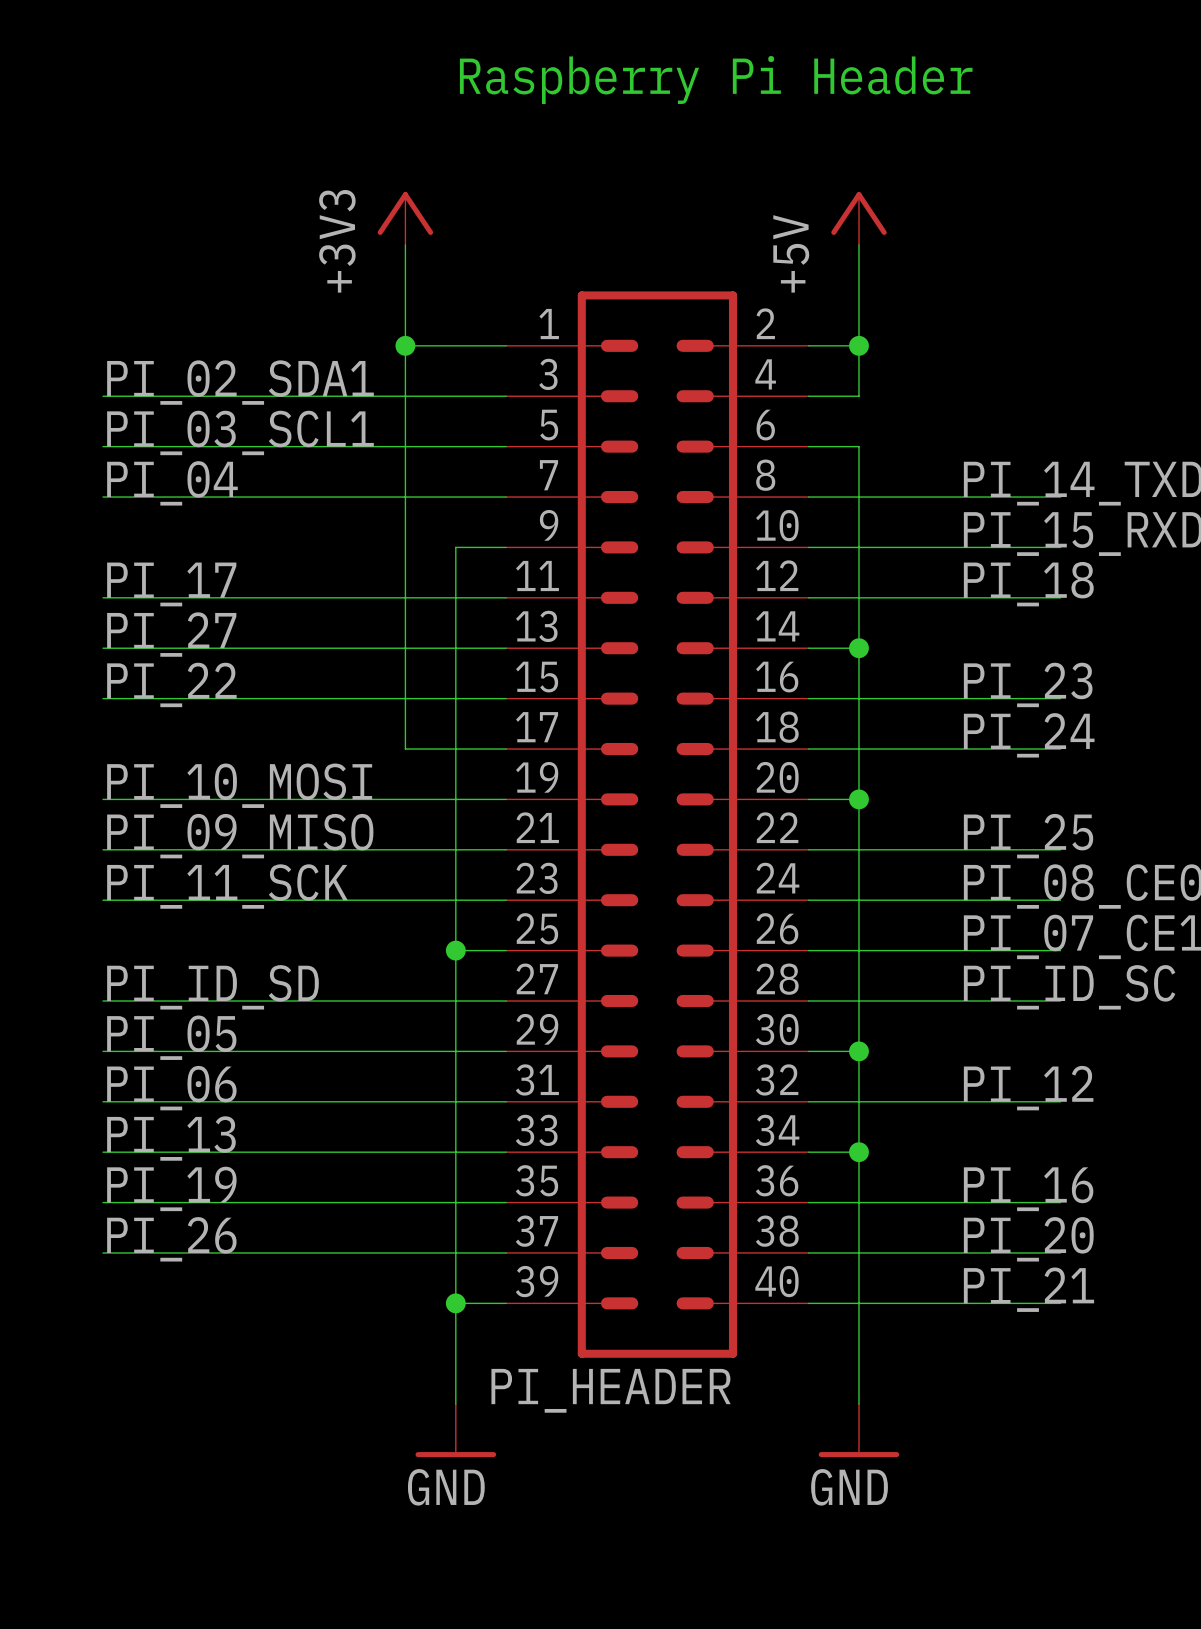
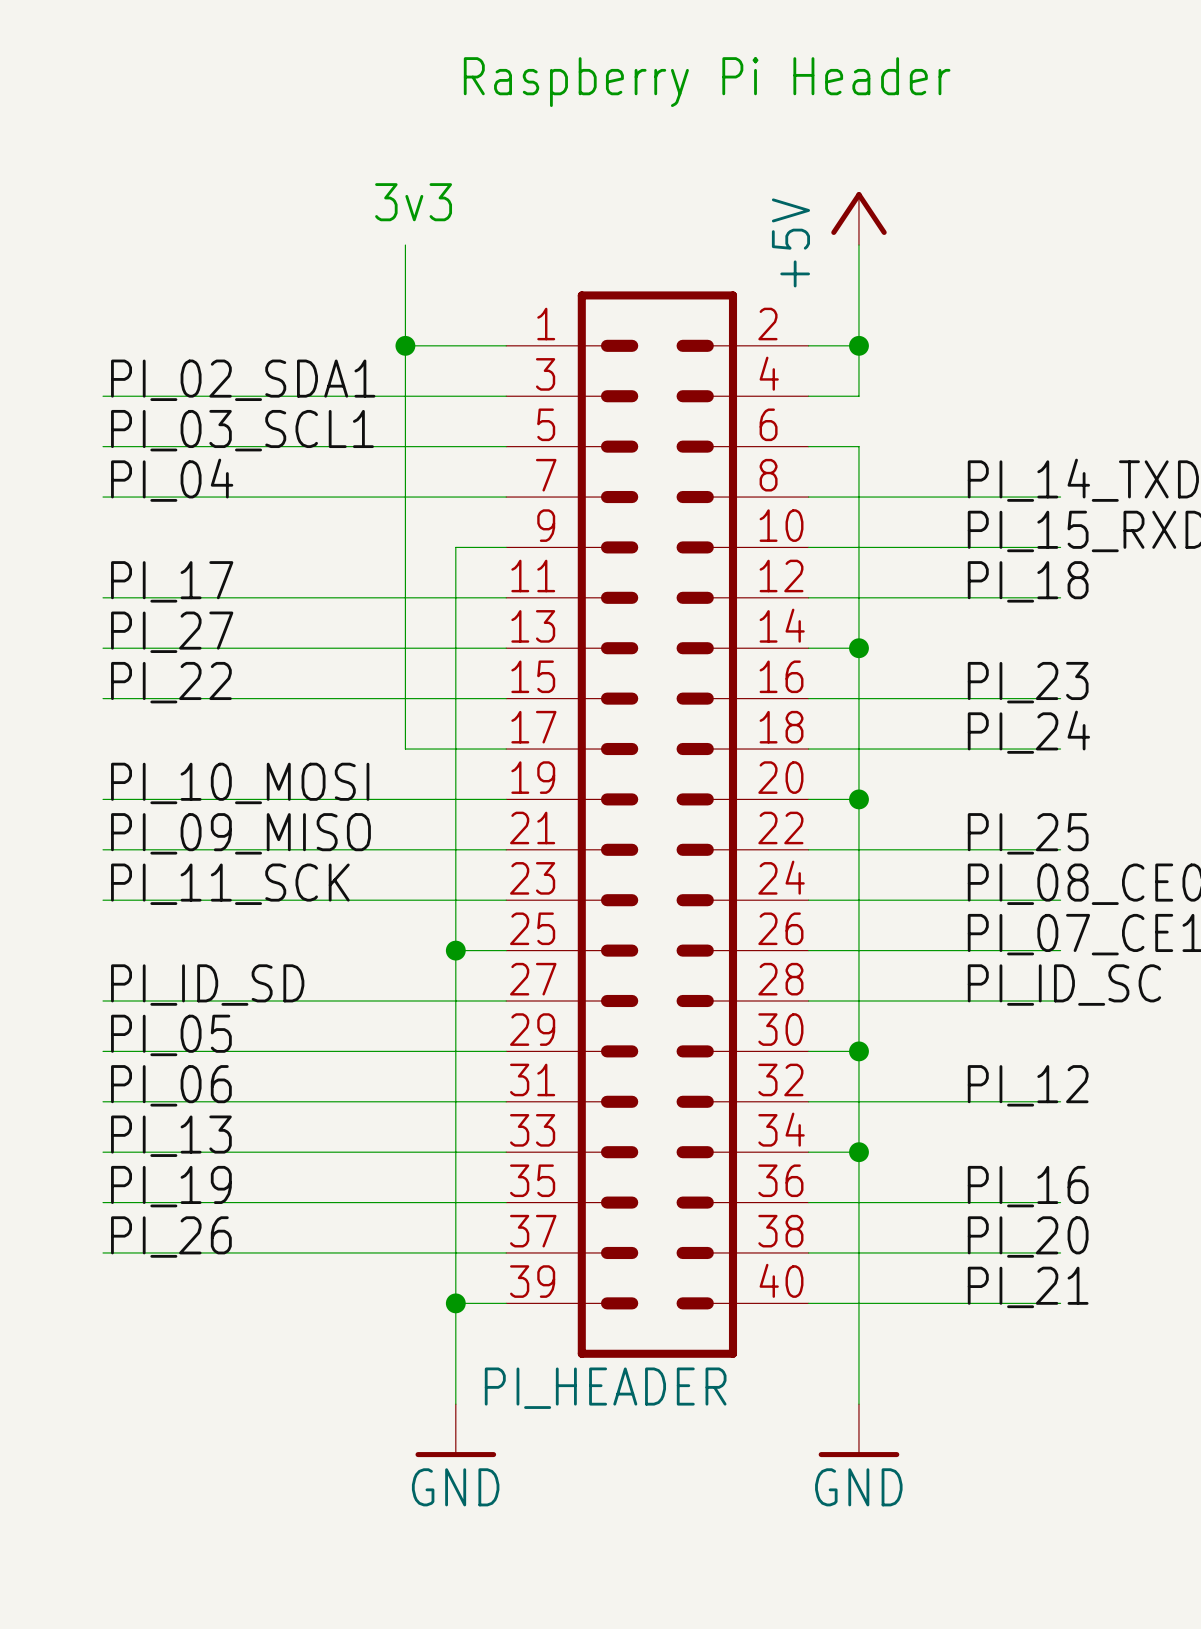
text: none -> 3v3 (413, 202)
power symbol: +3V3 (405, 218) -> none

